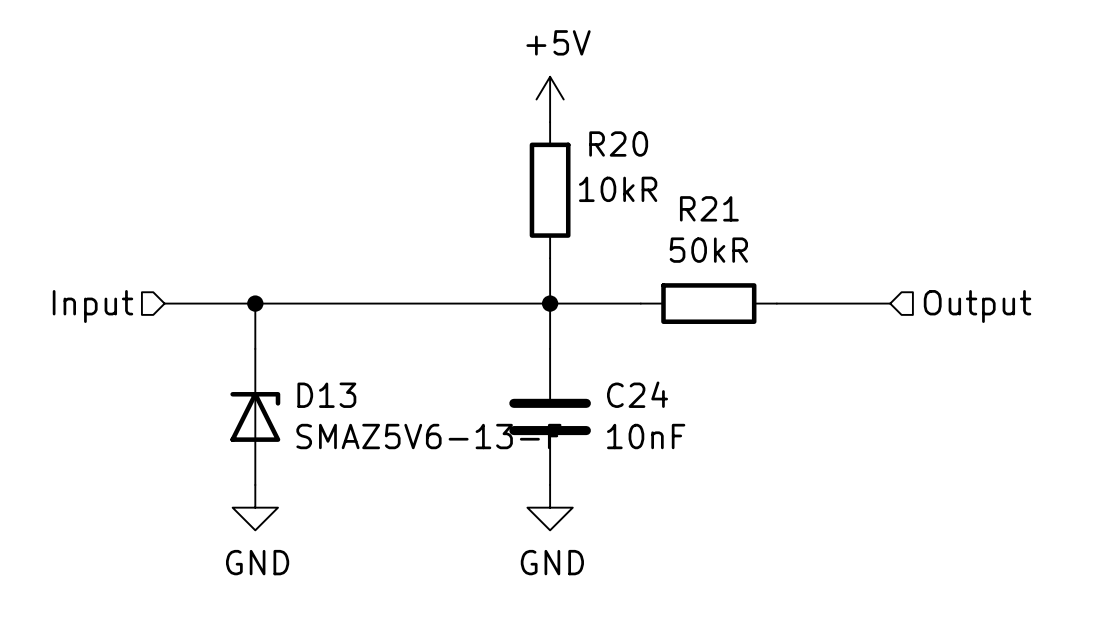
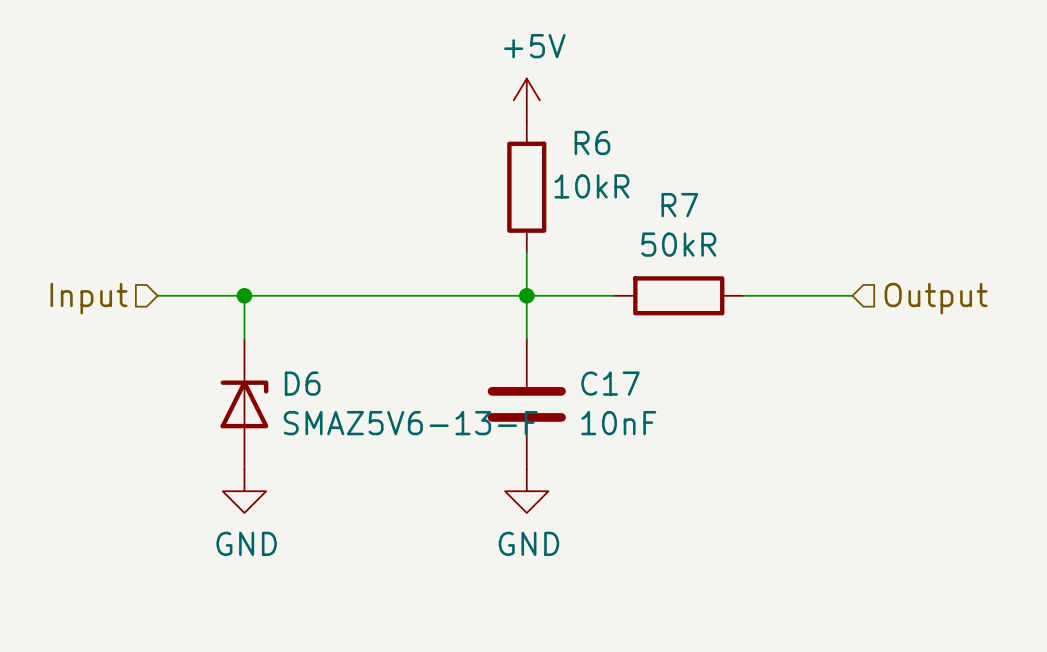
R20 name: R20 (618, 143) -> R6 (592, 142)
R21 name: R21 (709, 208) -> R7 (679, 205)
C24 name: C24 (637, 394) -> C17 (610, 383)
D13 name: D13 (326, 395) -> D6 (302, 383)

